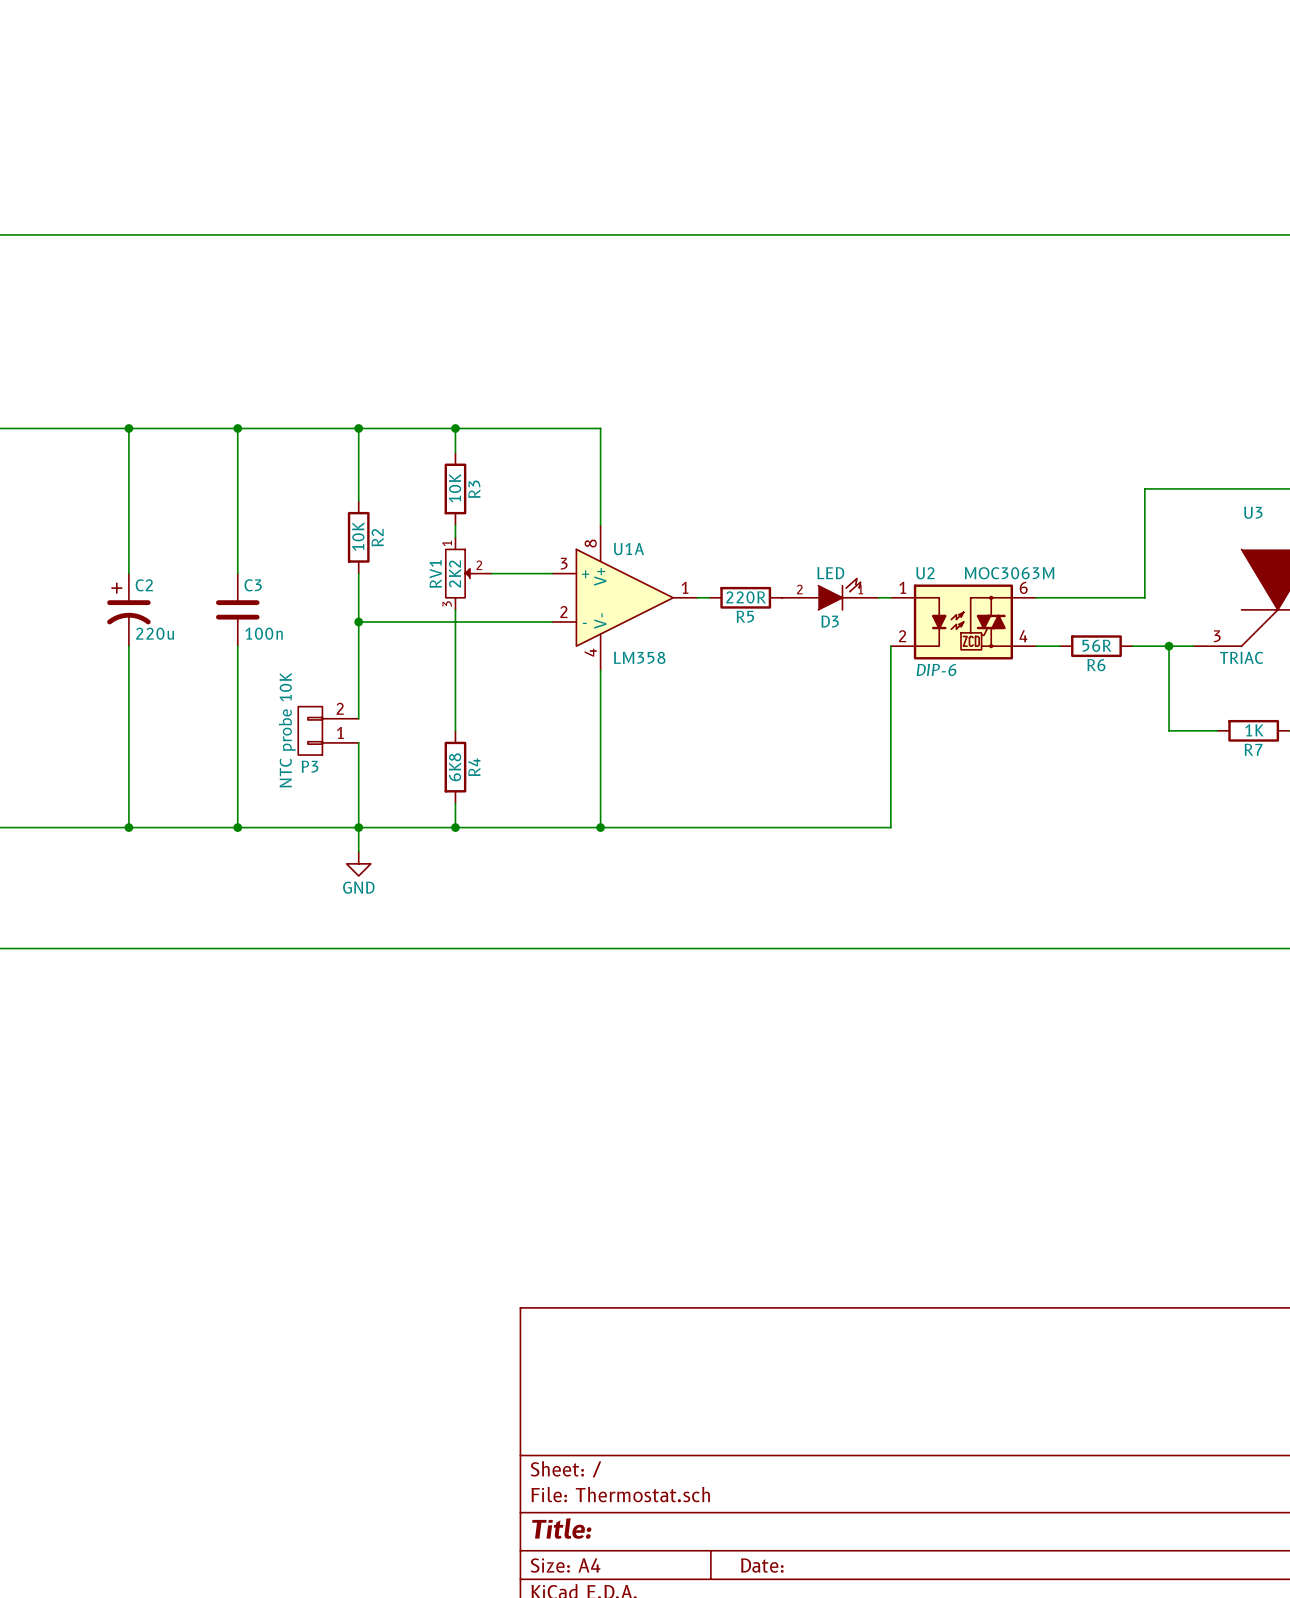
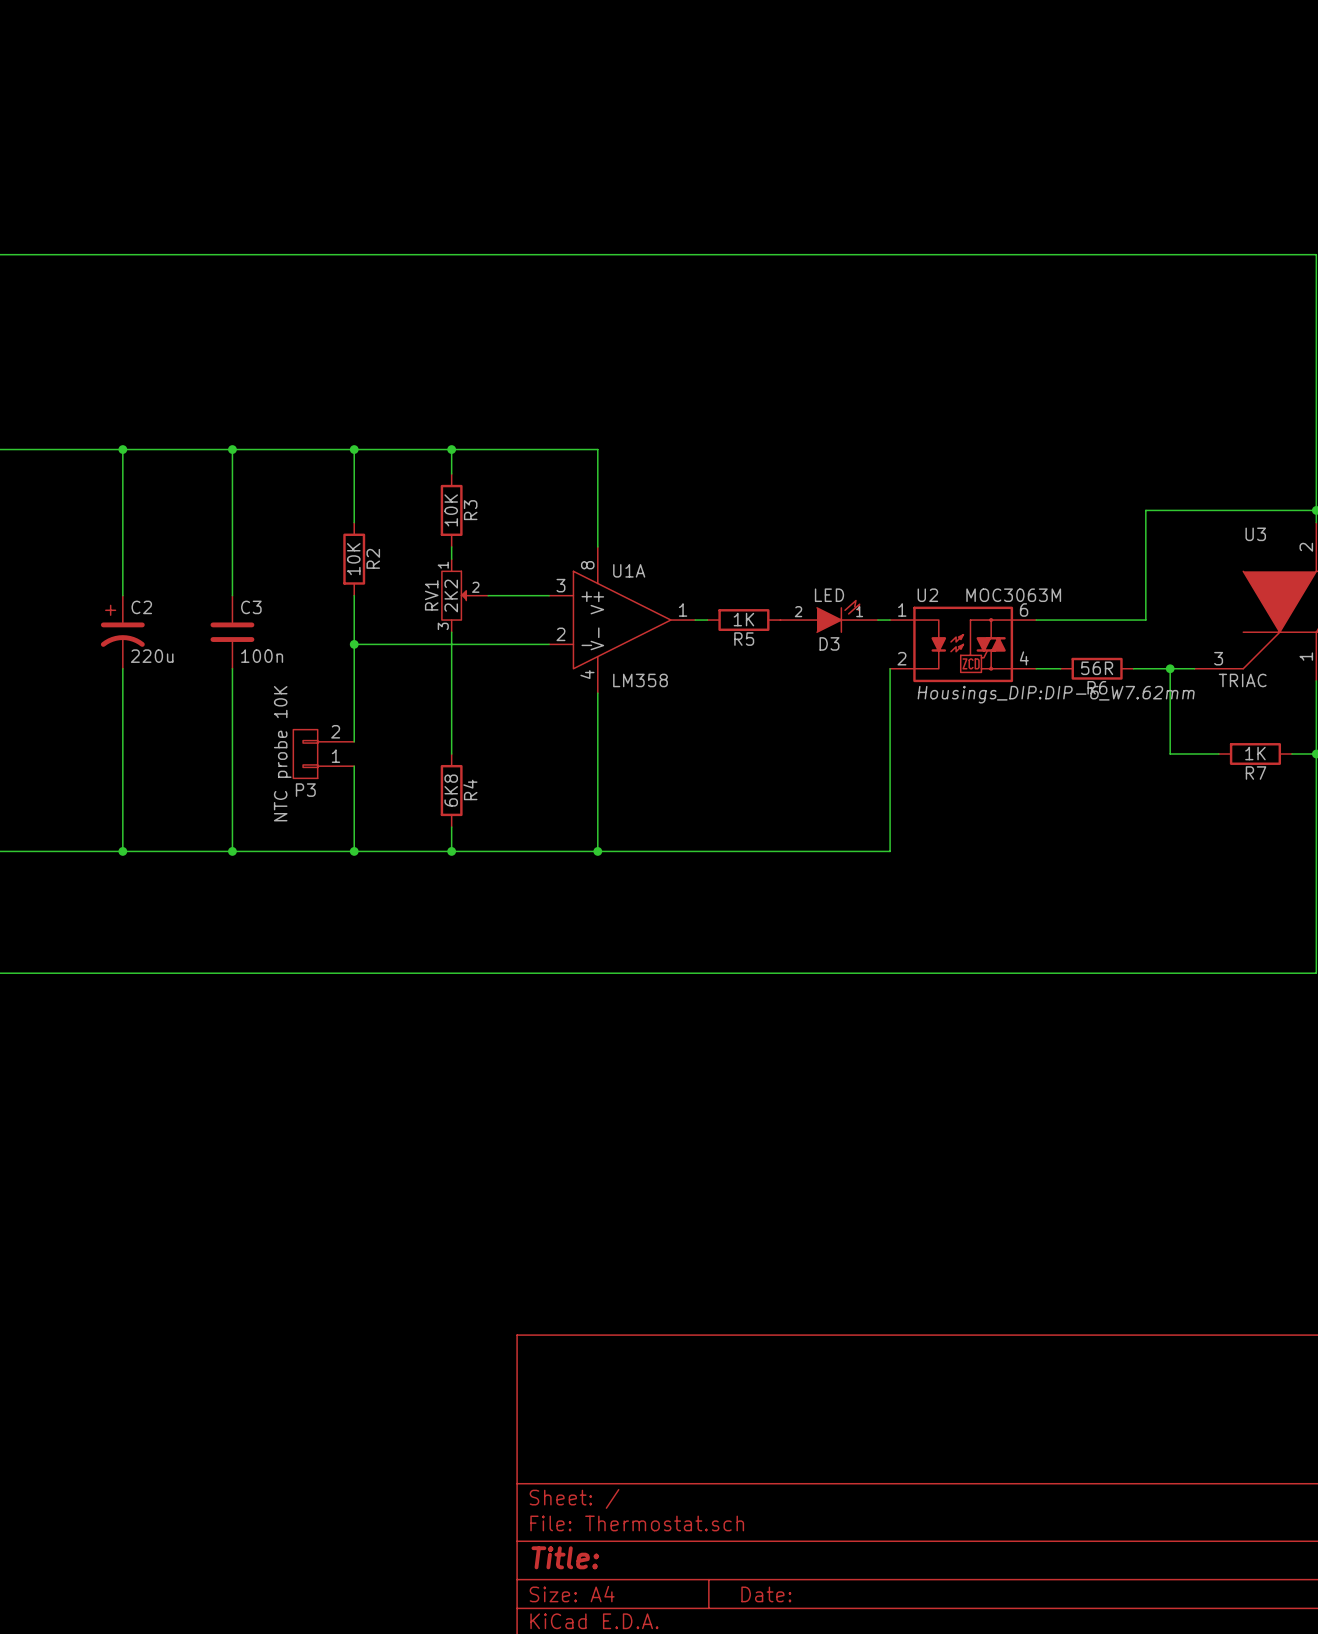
R5 value: 220R (746, 597) -> 1K (743, 619)
U2 text: DIP-6 (936, 669) -> Housings_DIP:DIP-6_W7.62mm (1056, 694)
wire: (358, 827) (358, 851) -> none
power symbol: GND (358, 863) -> none

